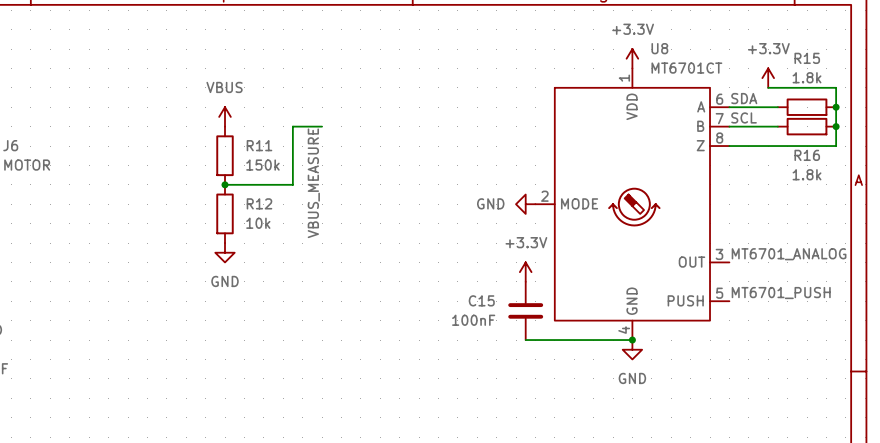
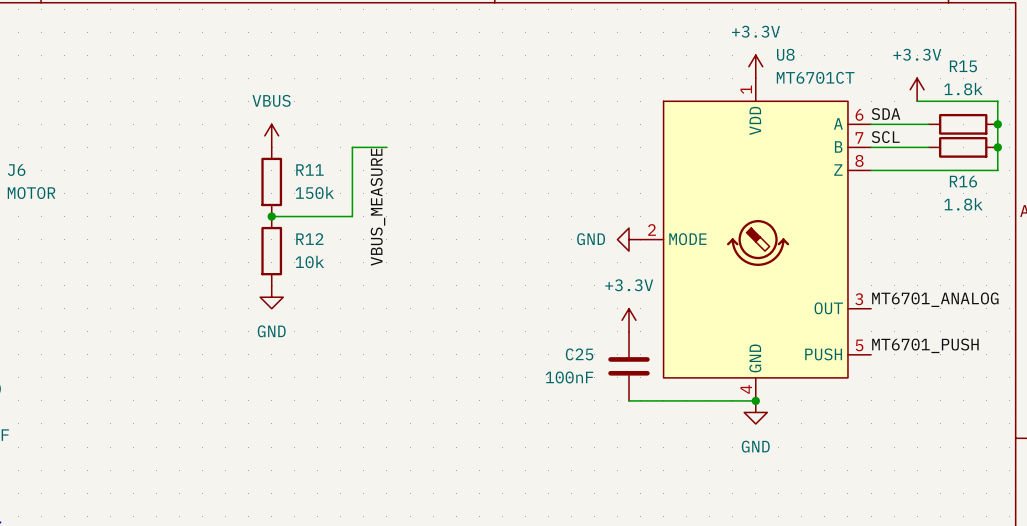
C15 name: C15 (481, 300) -> C25 (579, 354)

